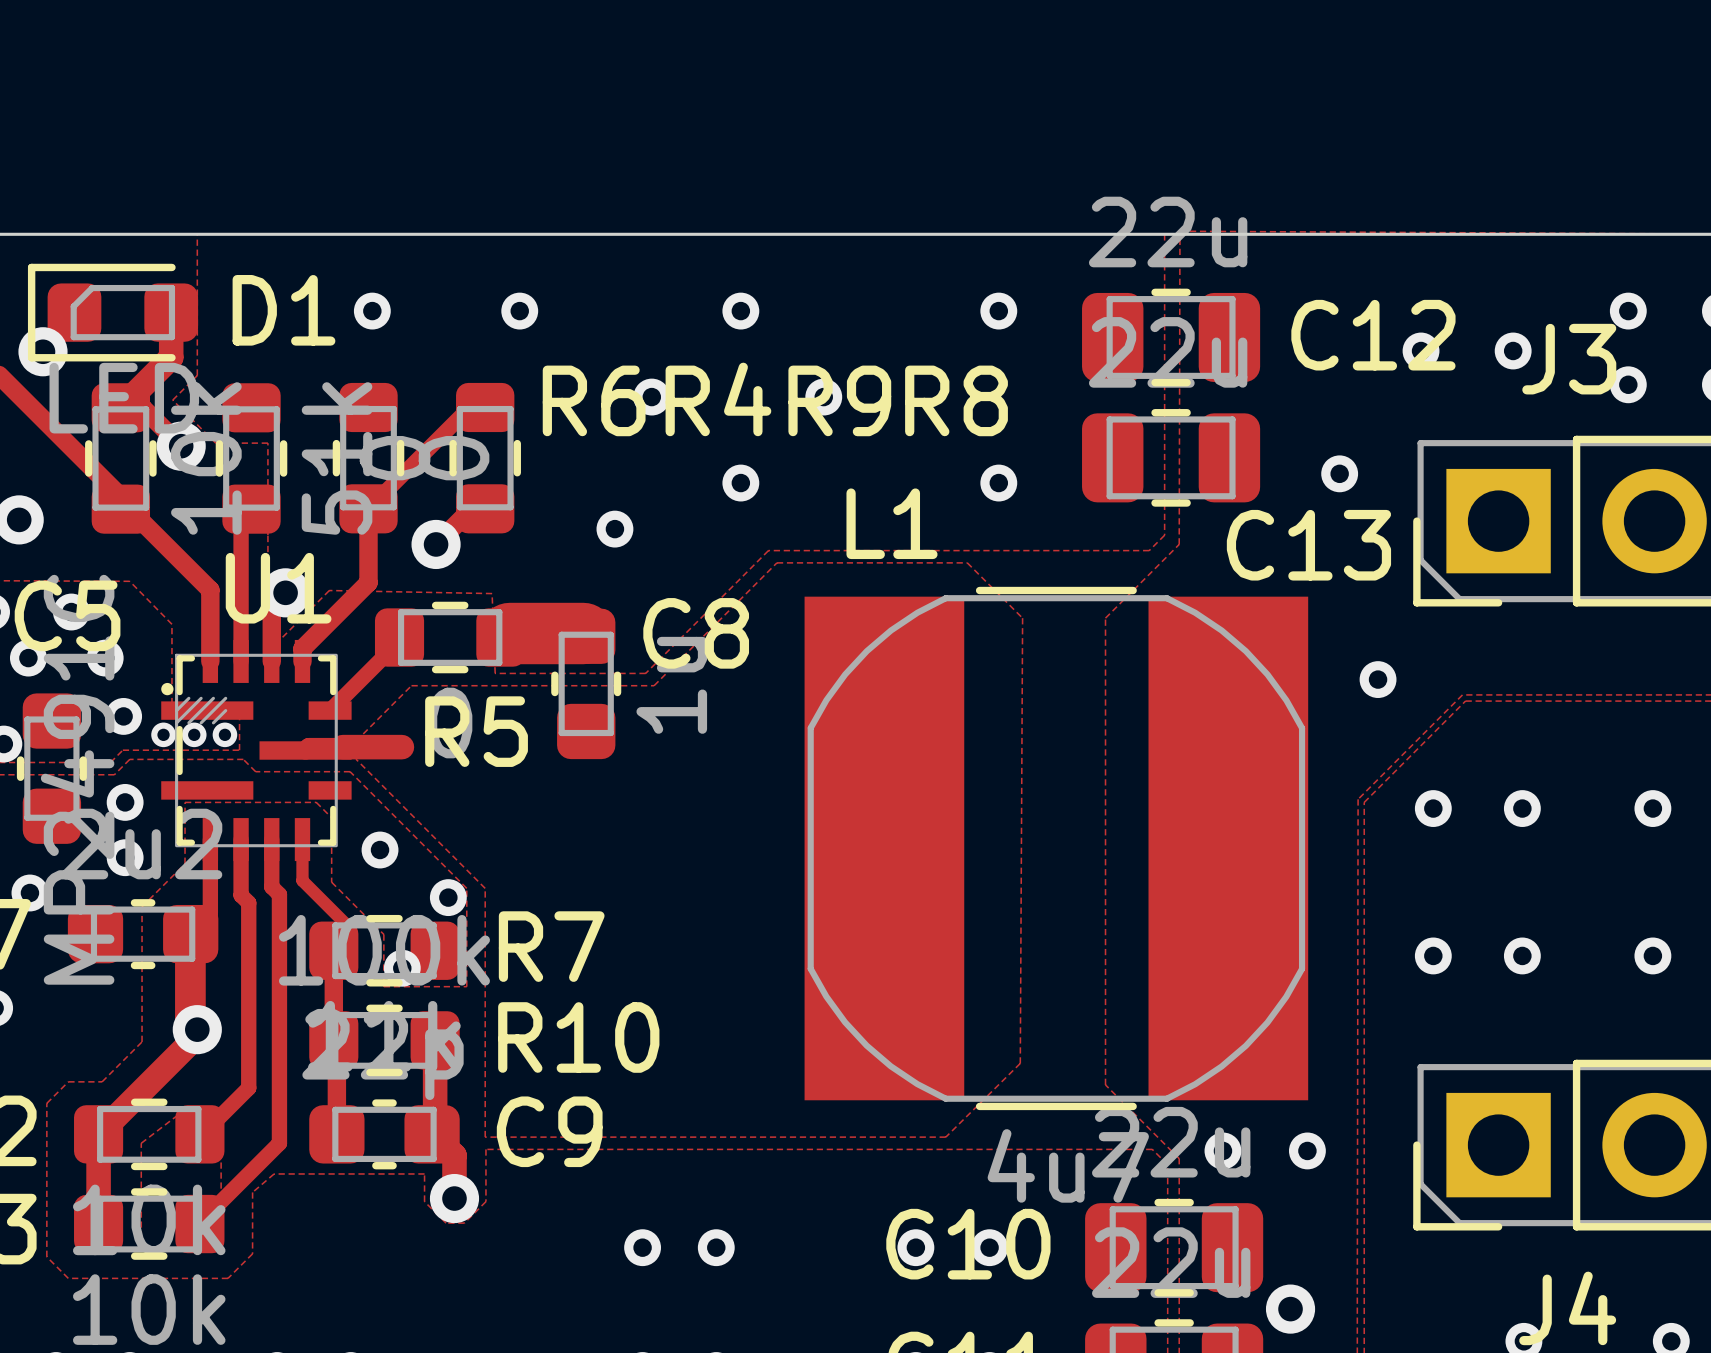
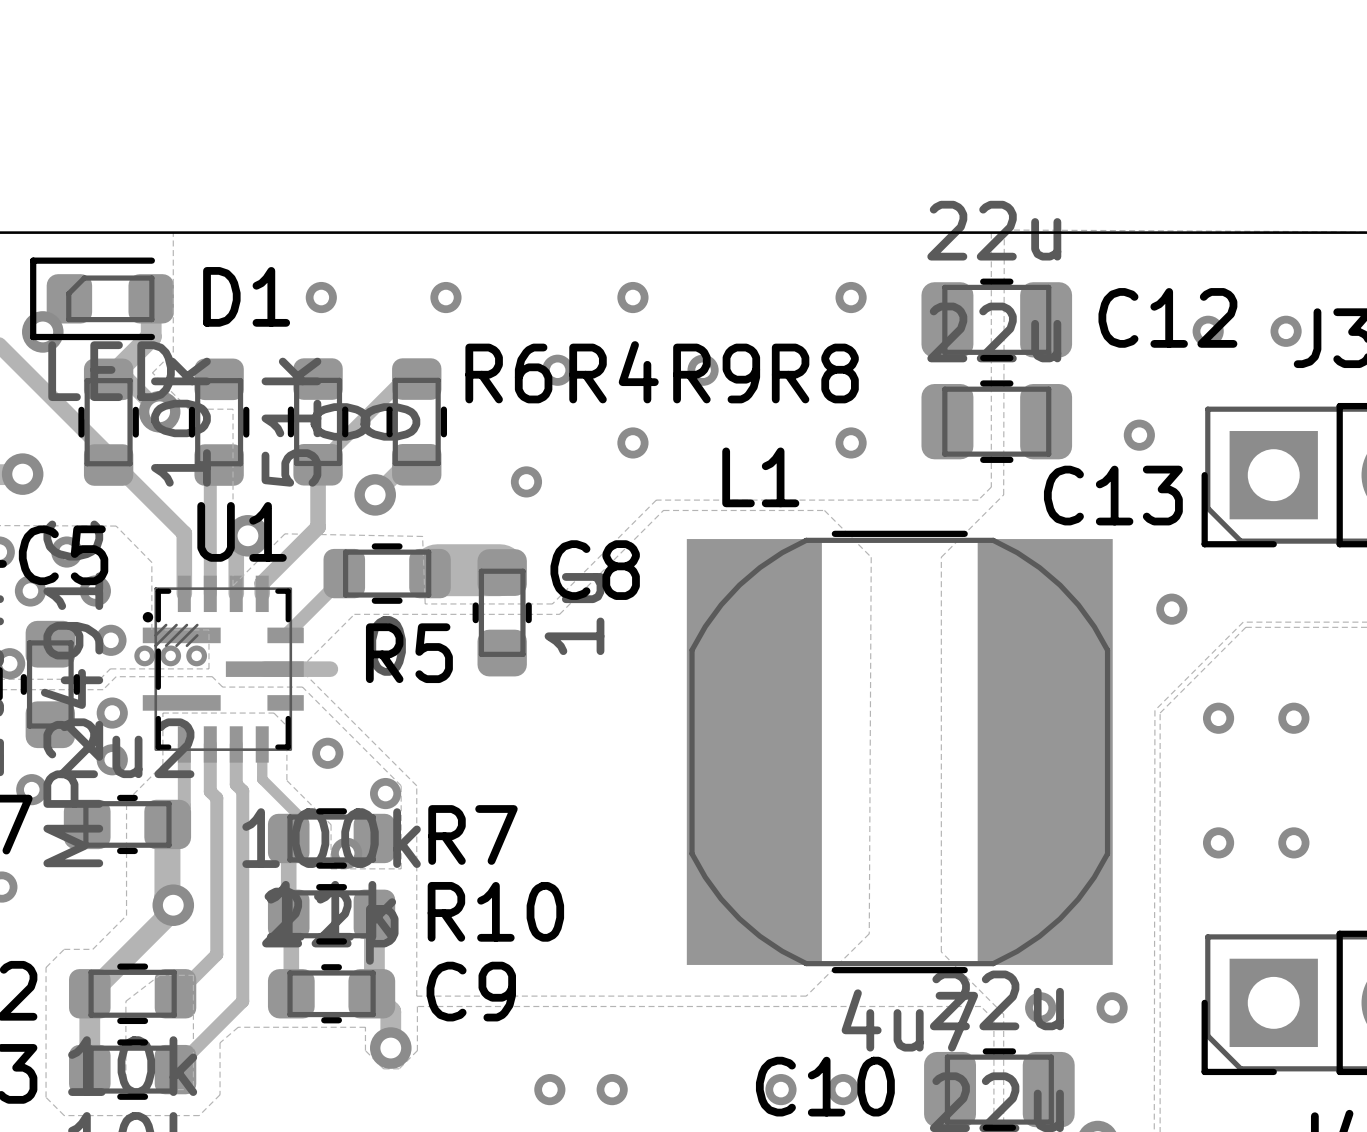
track: (401, 747) (308, 747) (305, 750) -> (330, 669) (264, 669)

